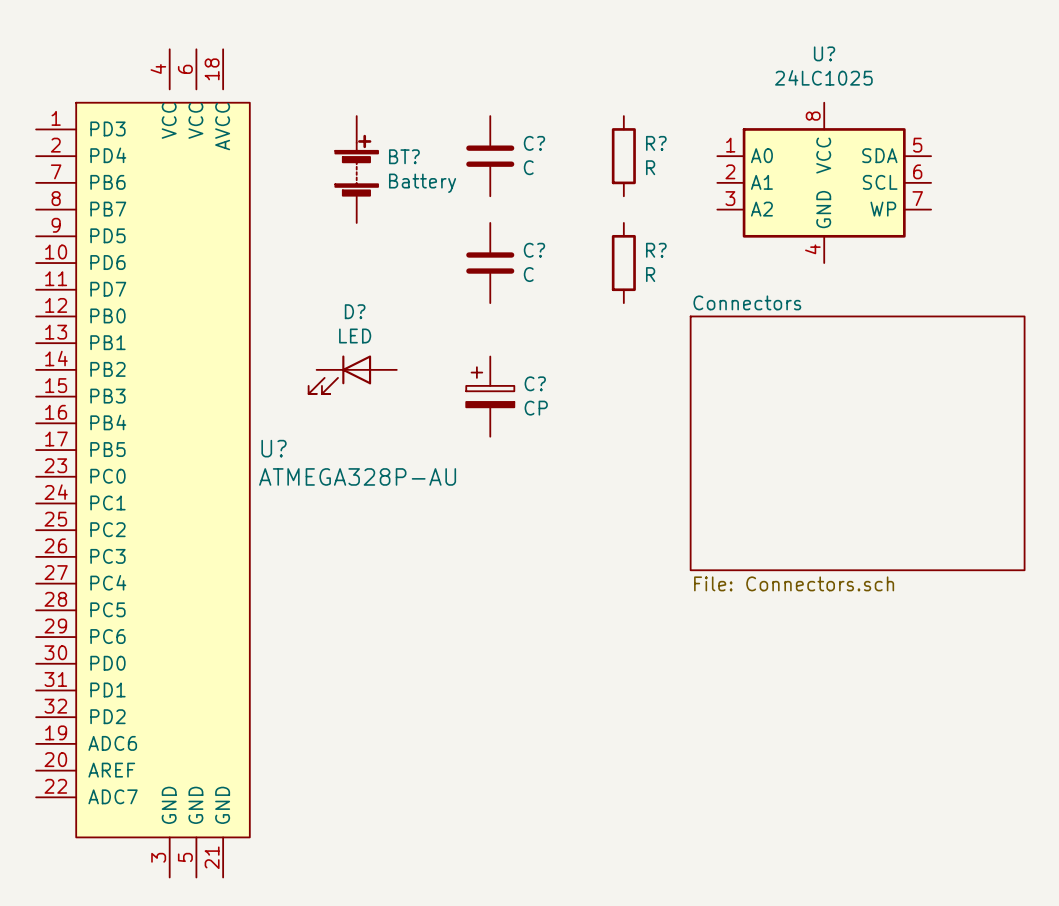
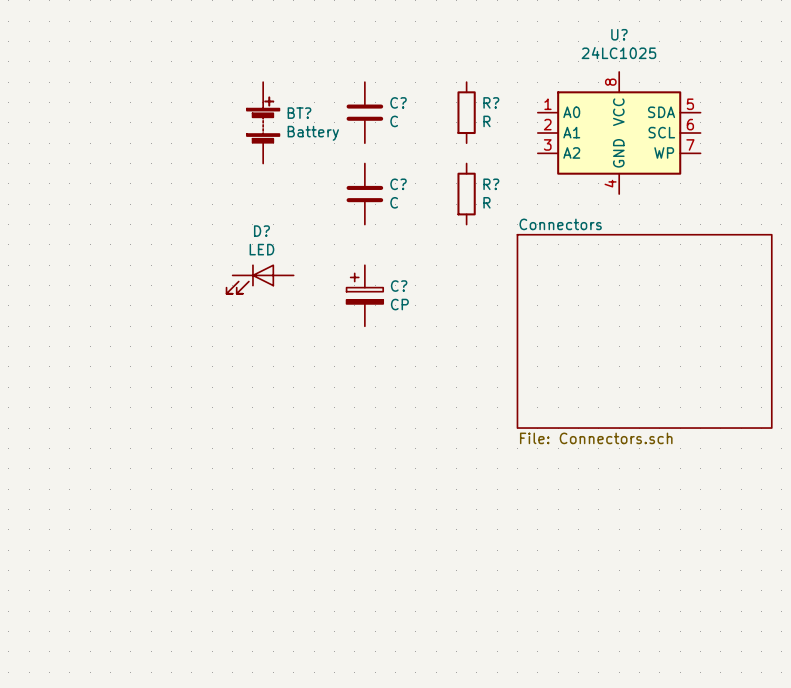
U?: ATMEGA328P-AU (142, 463) -> none

